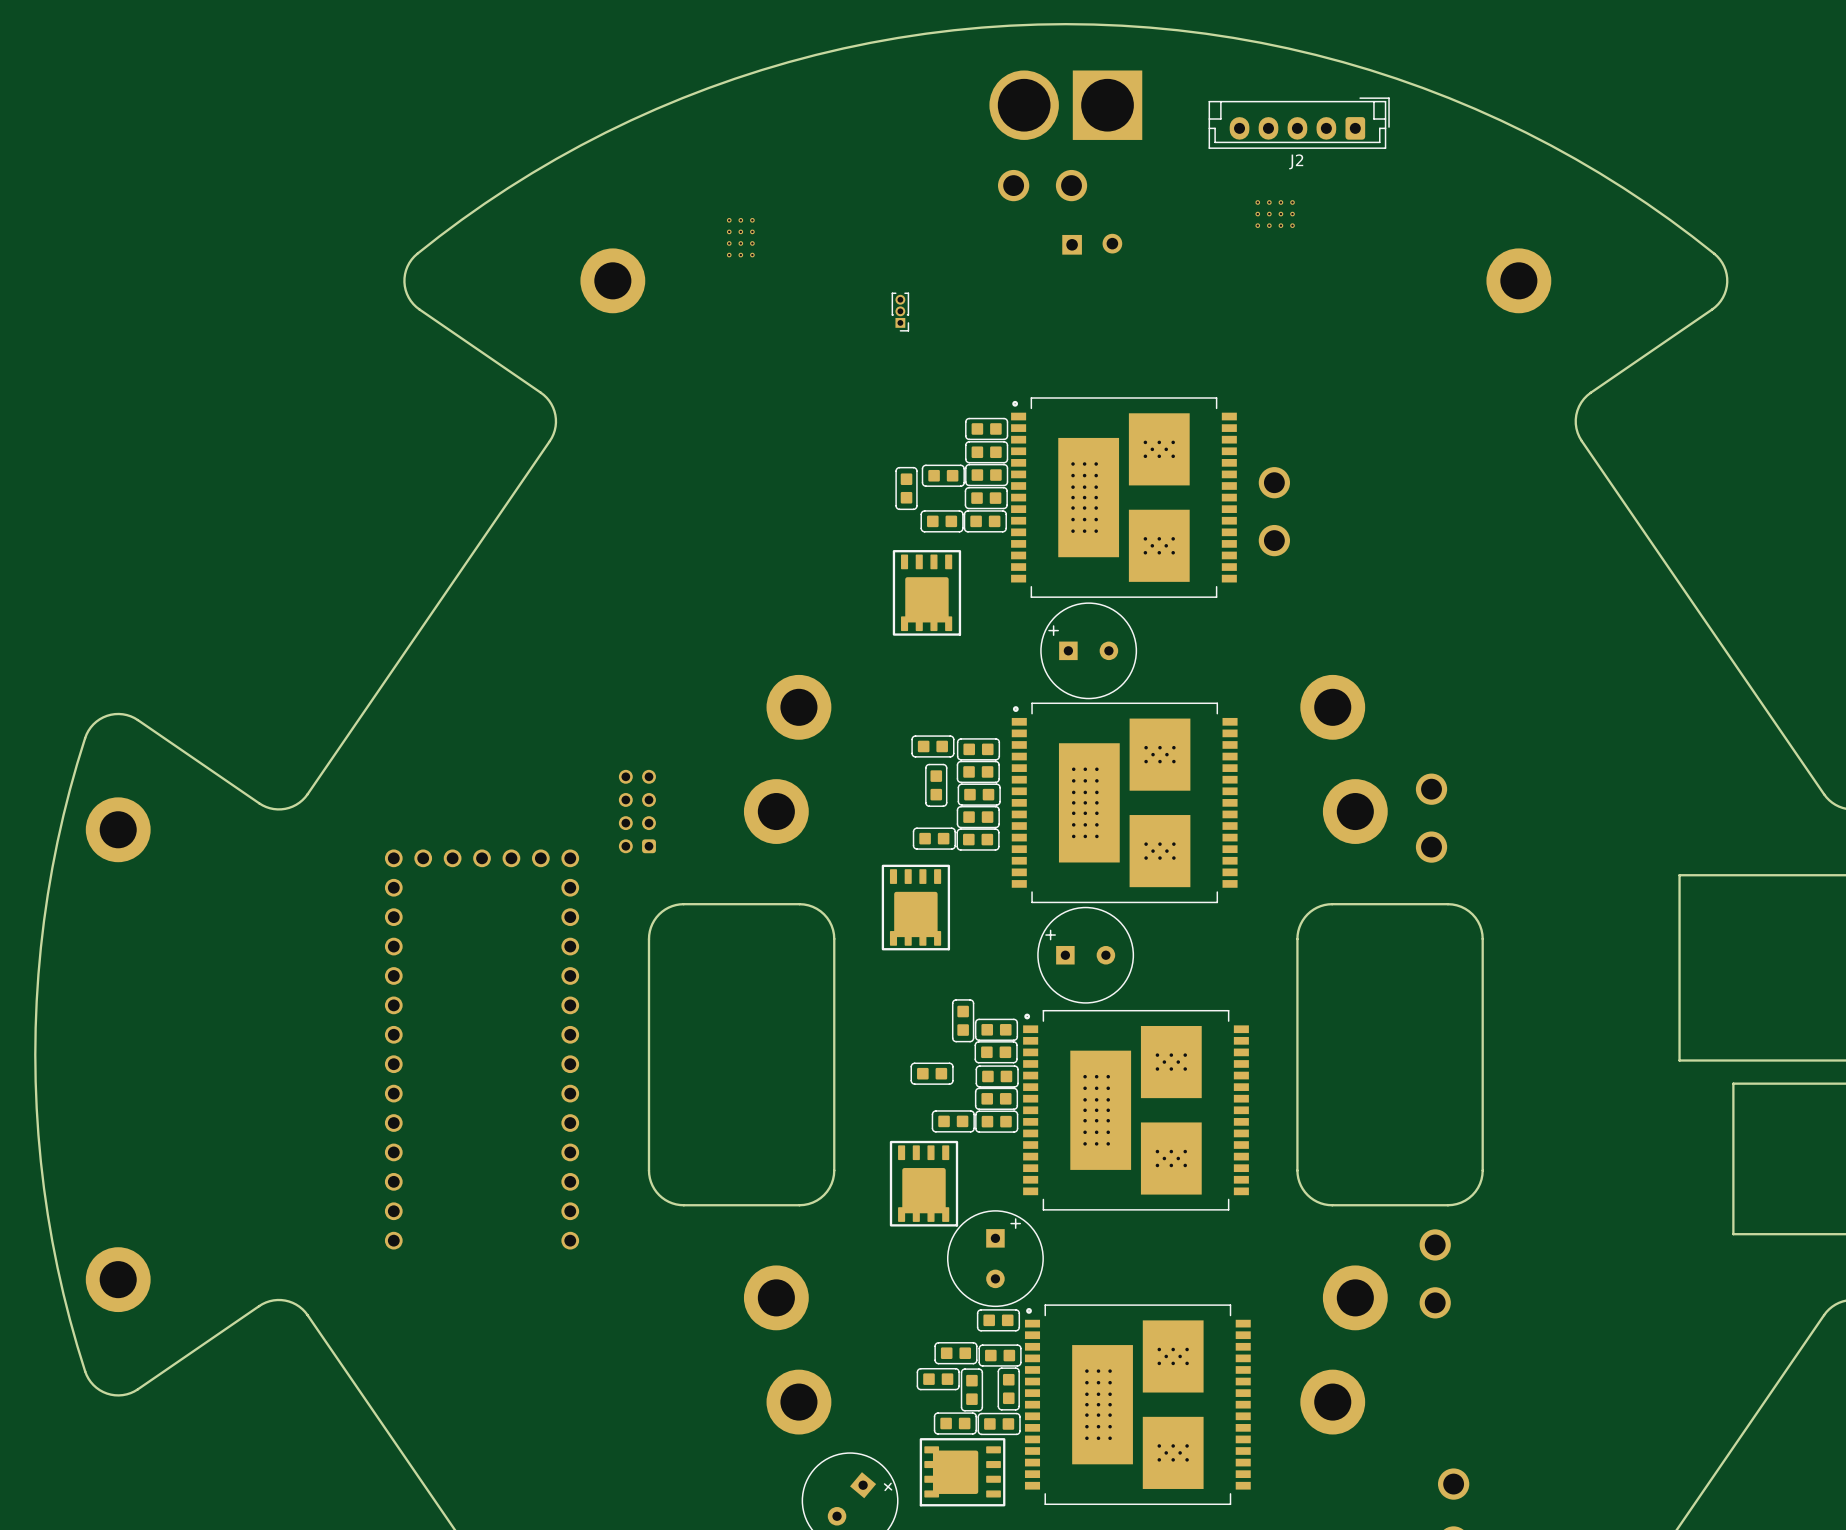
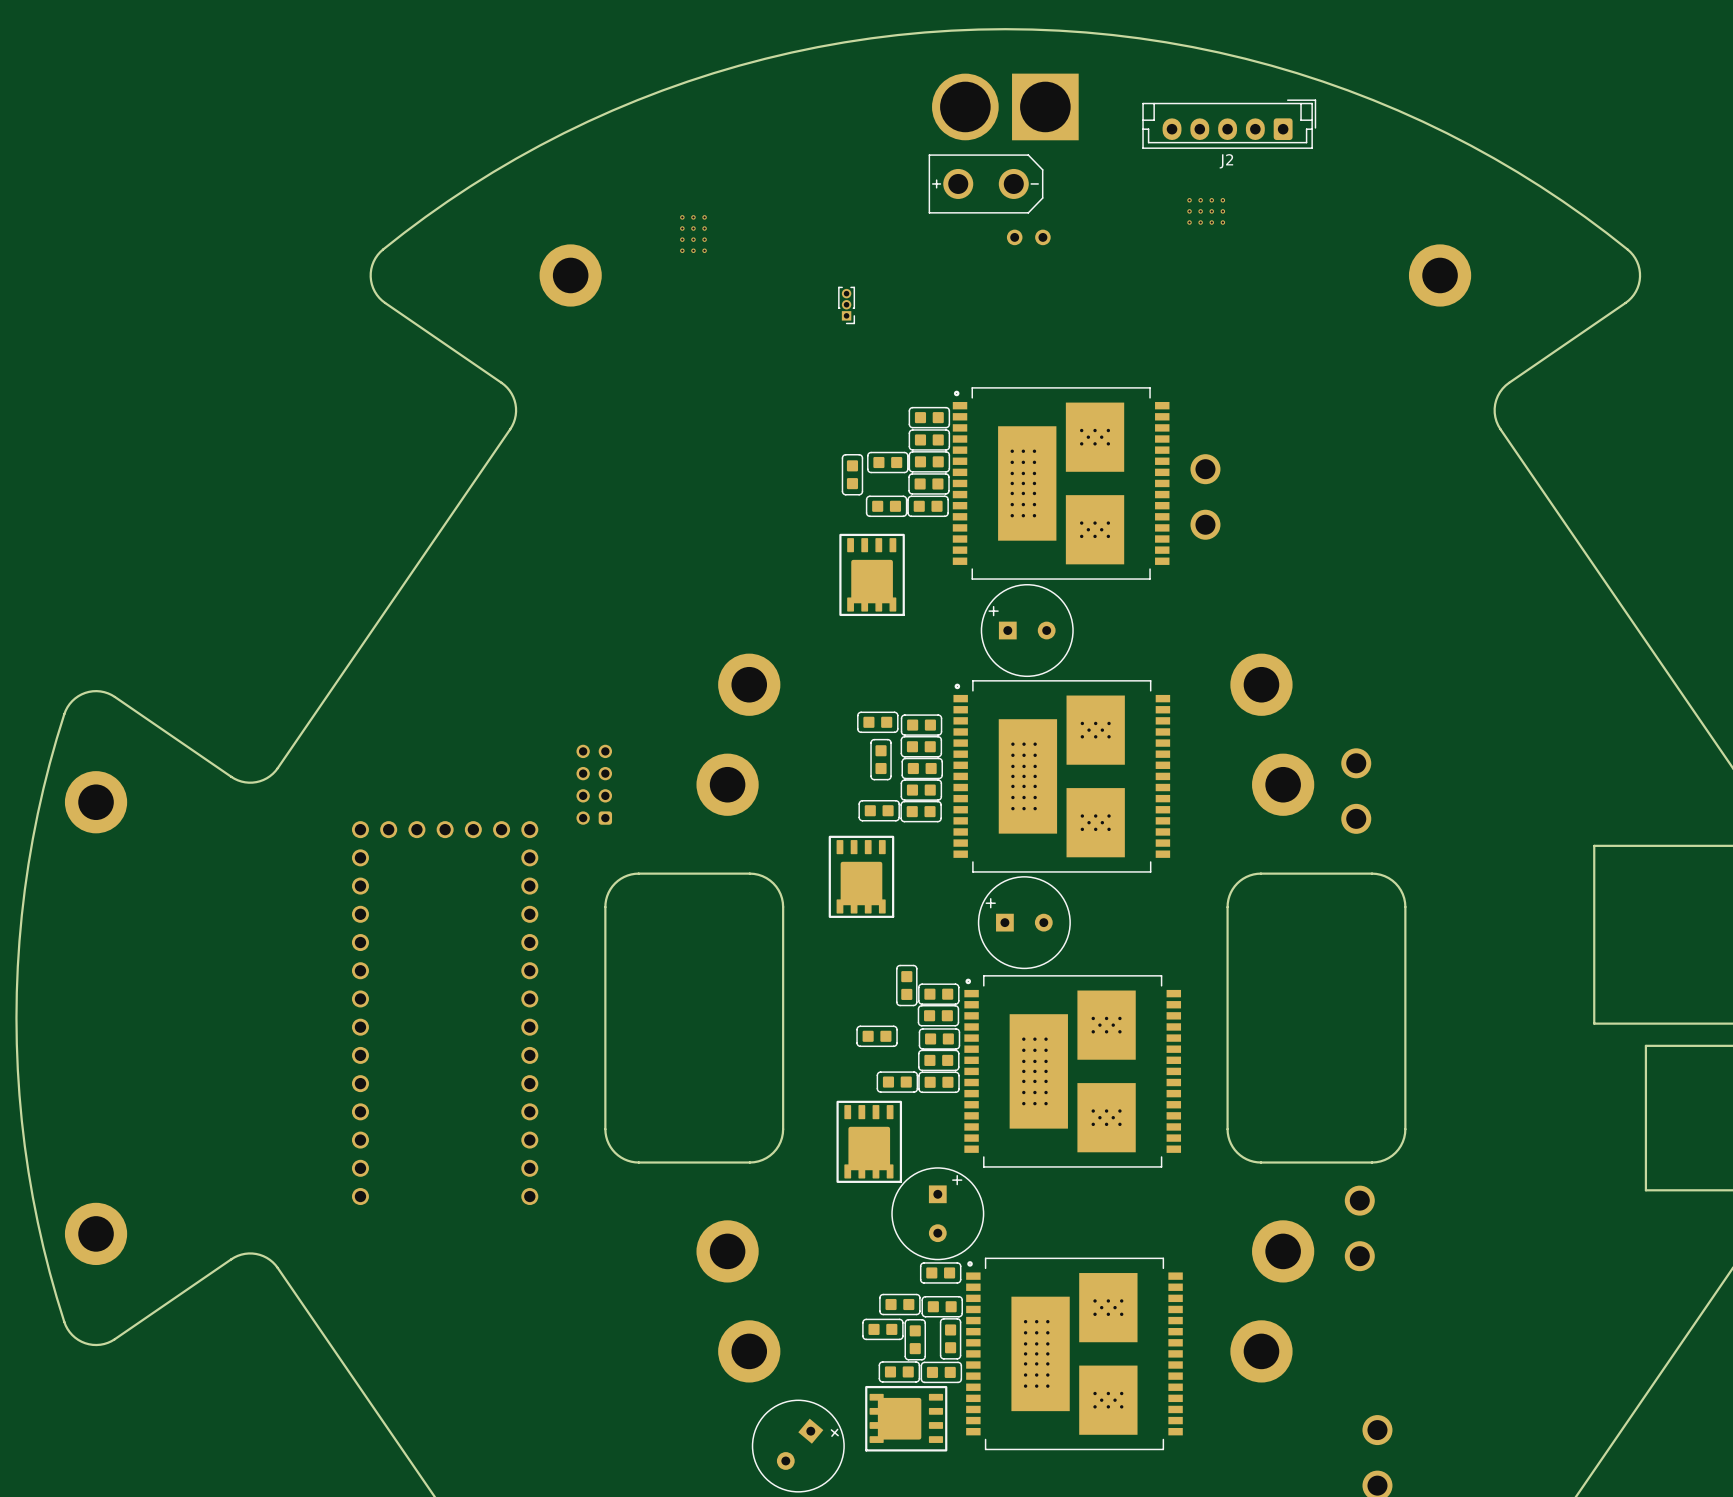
part side: top (1042, 185) -> bottom (986, 183)
part footprint: [1062, 233, 1123, 255] -> [1006, 229, 1051, 246]

